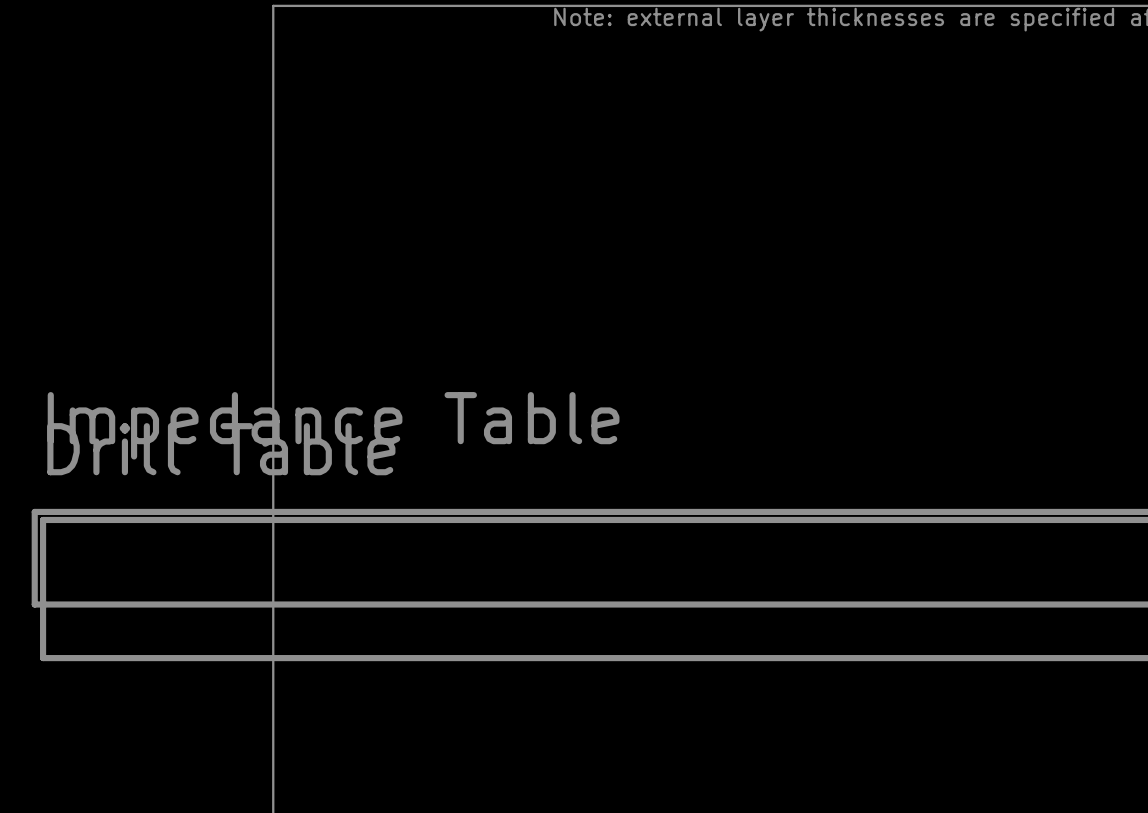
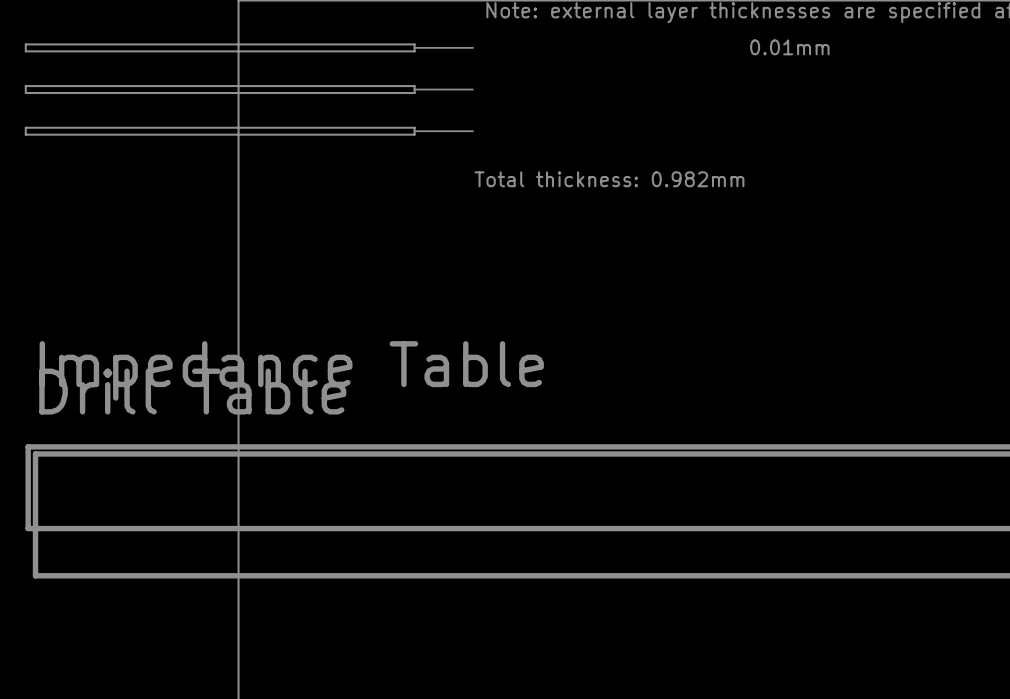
line: none -> (25, 44) (25, 51) (414, 51) (414, 44) (25, 44)
line: none -> (414, 47) (472, 47)
text: none -> 0.01mm (789, 47)
line: none -> (25, 86) (414, 86) (414, 93) (25, 93) (25, 86)
line: none -> (414, 89) (472, 89)
line: none -> (25, 127) (25, 134) (414, 134) (414, 127) (25, 127)
line: none -> (414, 131) (472, 131)
text: none -> Total thickness: 0.982mm (609, 179)

